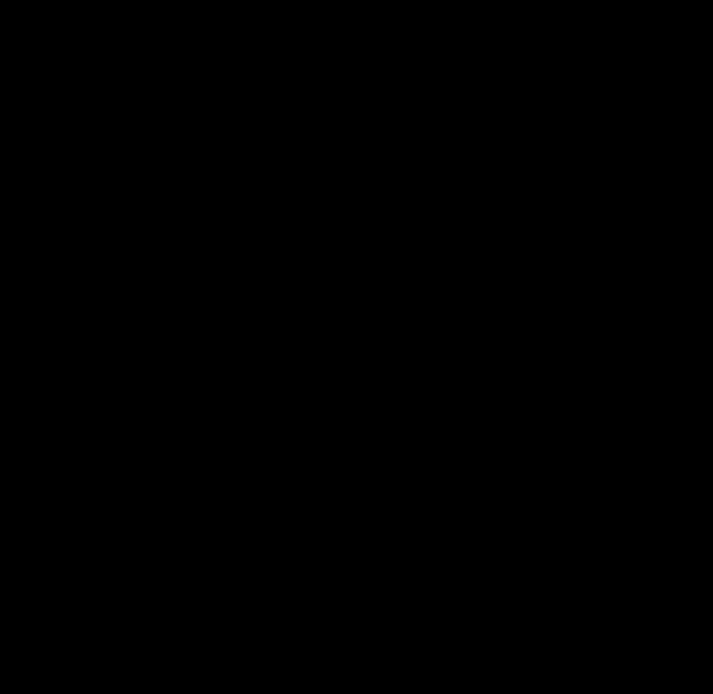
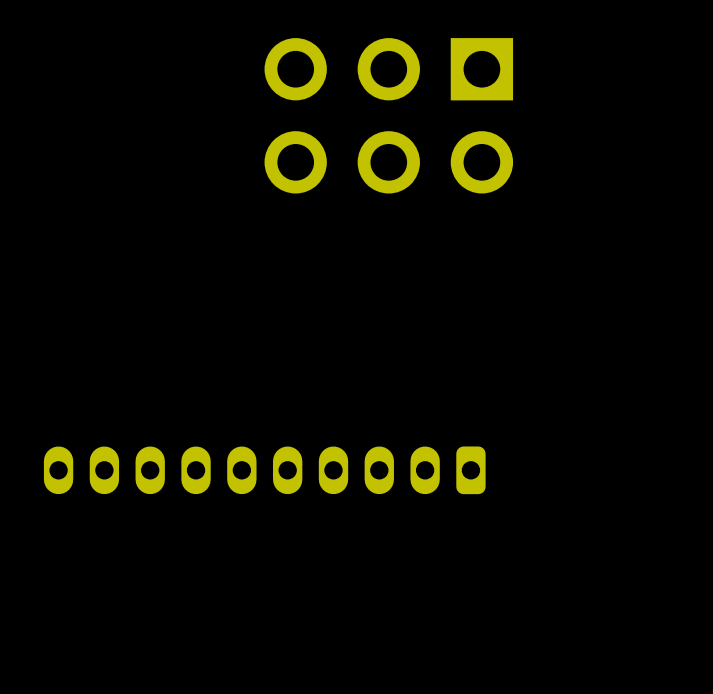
part: none -> (388, 115)
part: none -> (264, 470)

